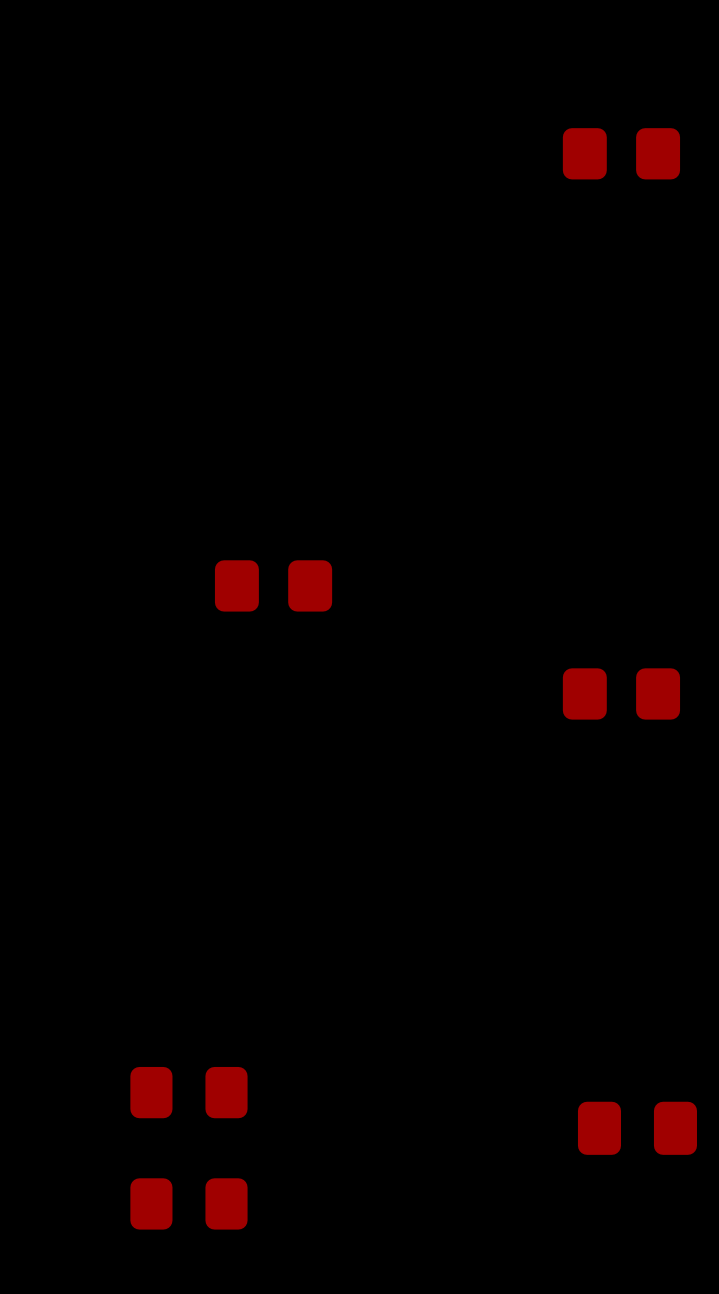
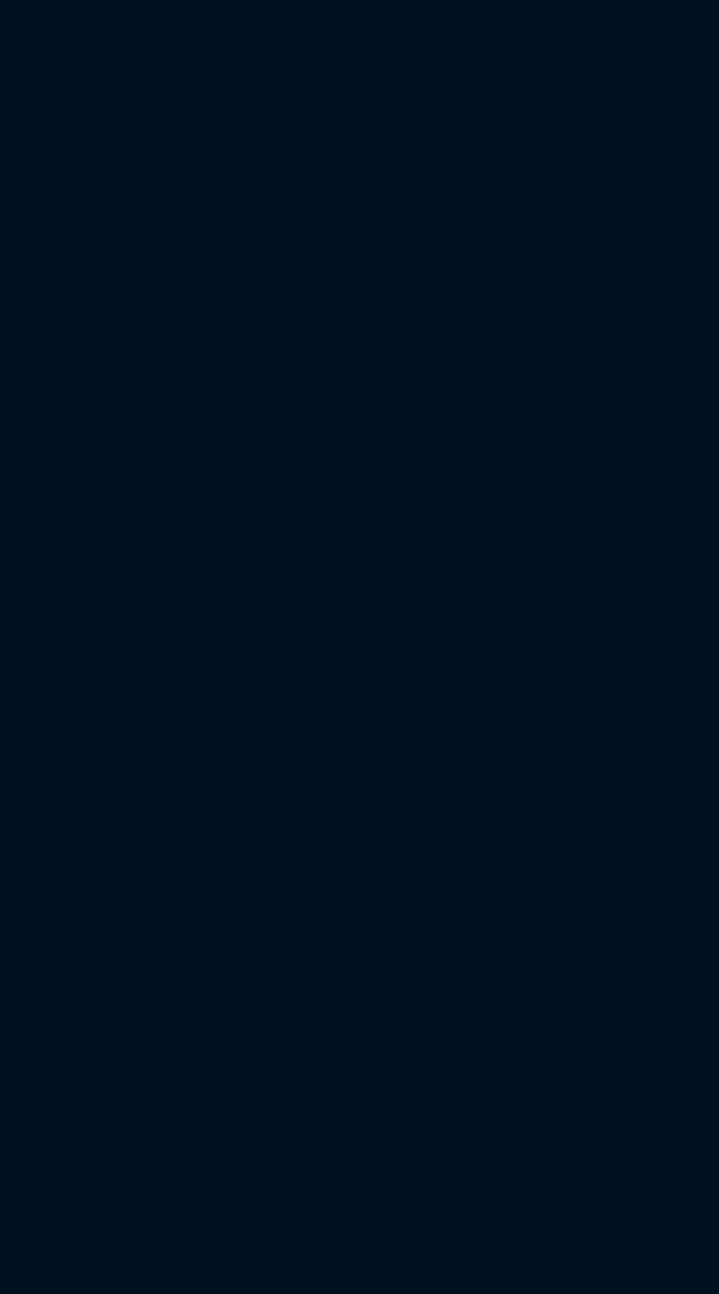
part: (621, 153) -> none
part: (273, 585) -> none
part: (621, 693) -> none
part: (188, 1092) -> none
part: (637, 1128) -> none
part: (188, 1203) -> none

